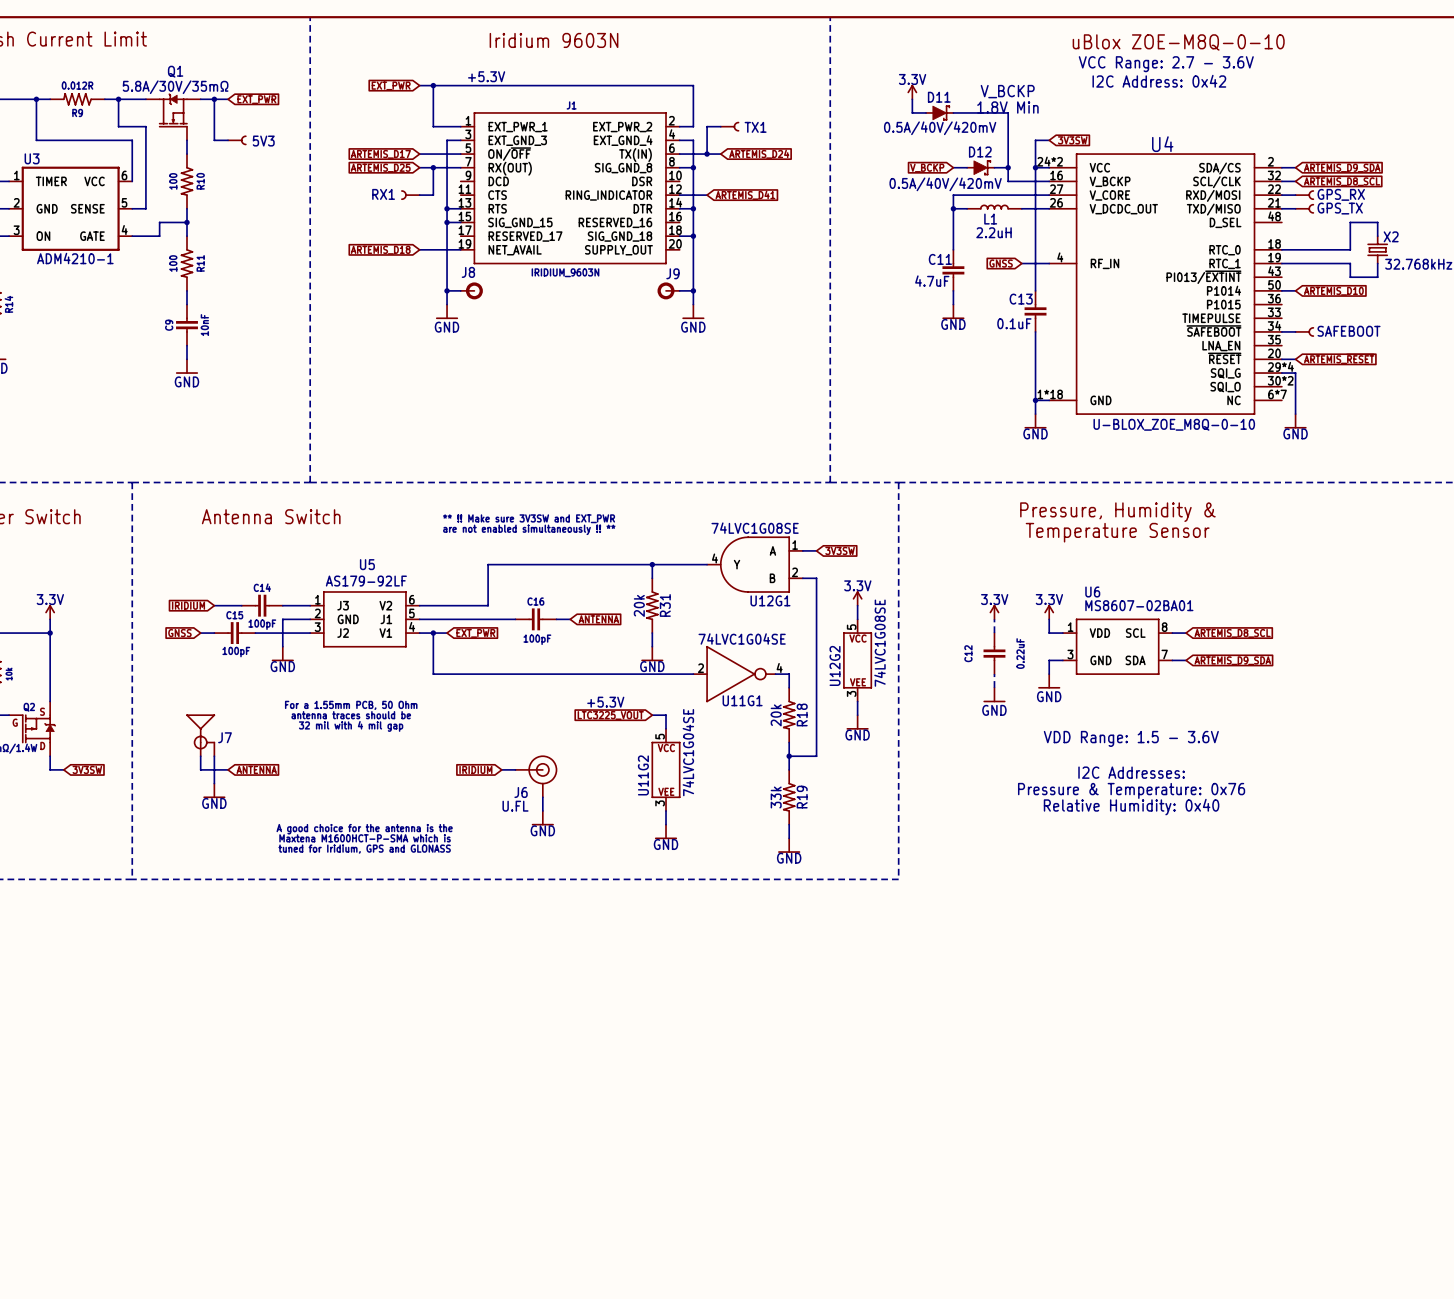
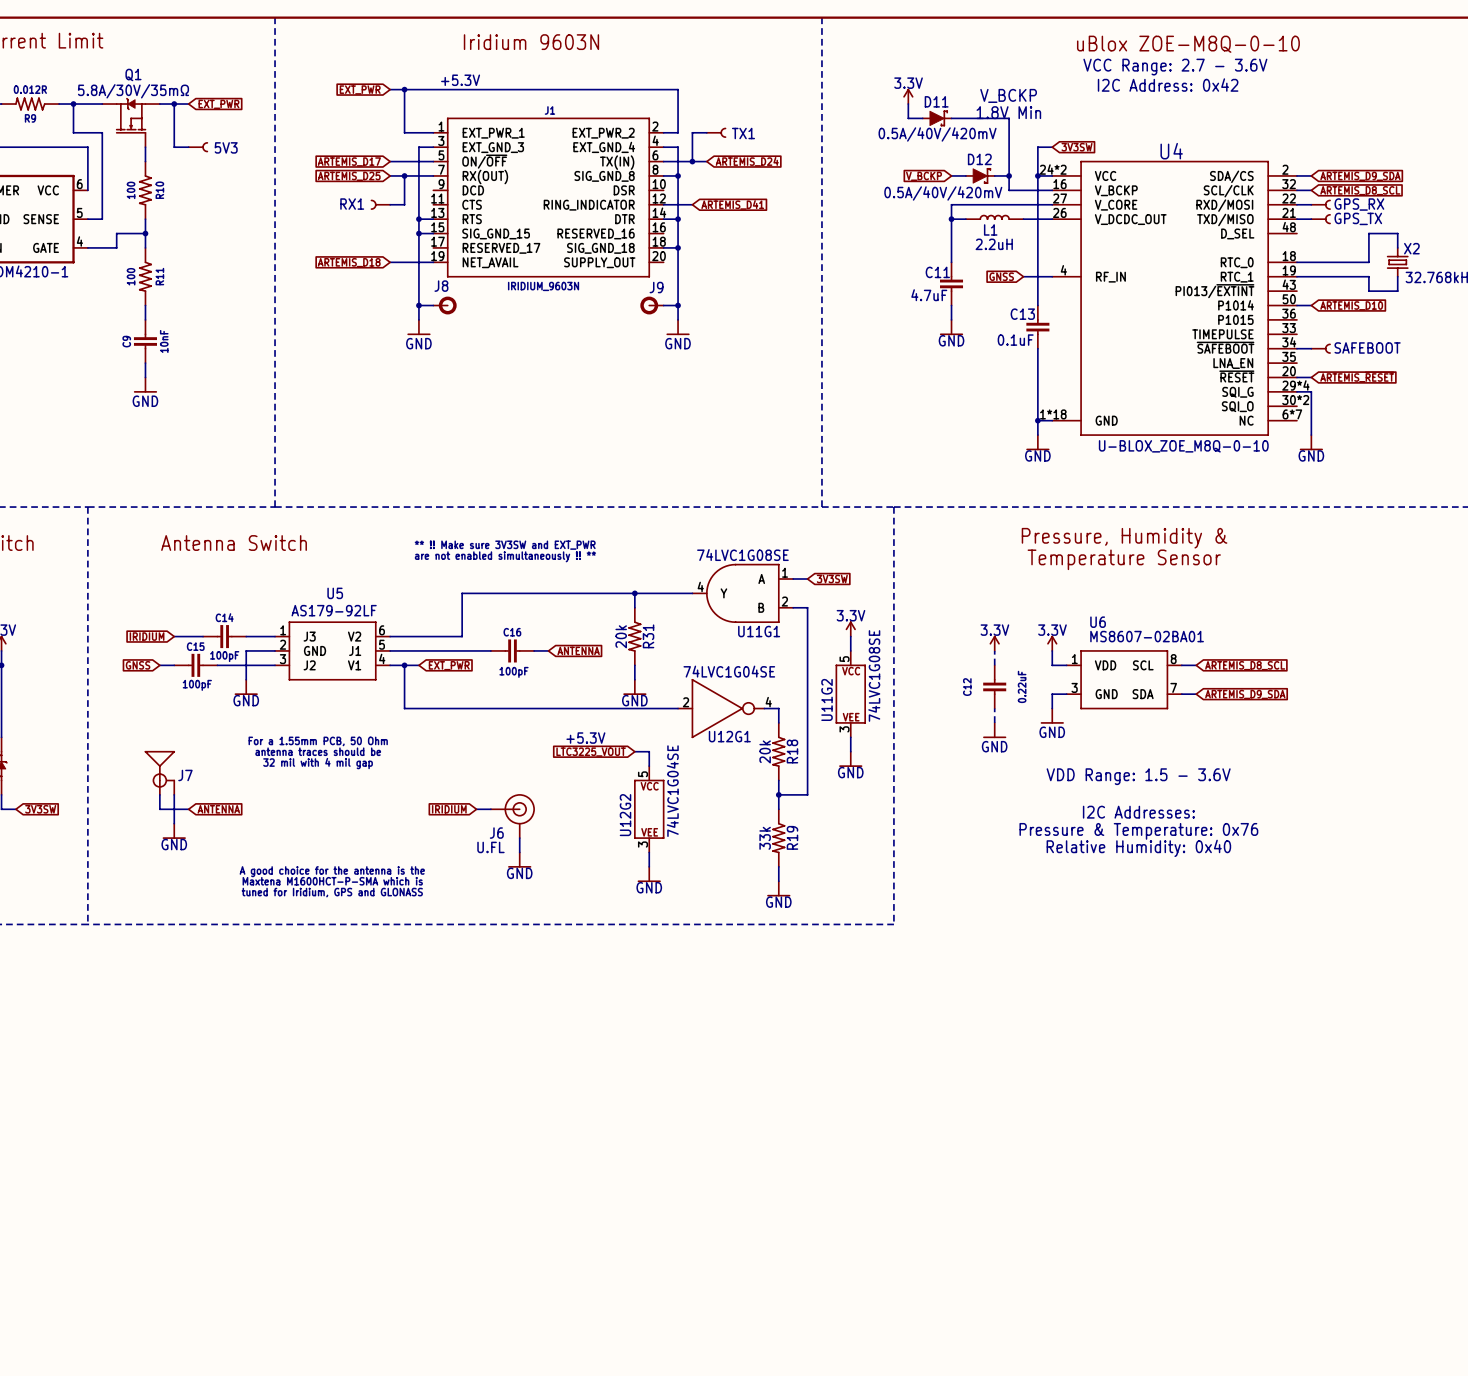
U12G1 name: U12G1 (770, 600) -> U11G1 (759, 631)
U12G2 name: U12G2 (835, 665) -> U11G2 (827, 699)
U11G1 name: U11G1 (742, 700) -> U12G1 (729, 736)
U11G2 name: U11G2 (643, 775) -> U12G2 (625, 815)

